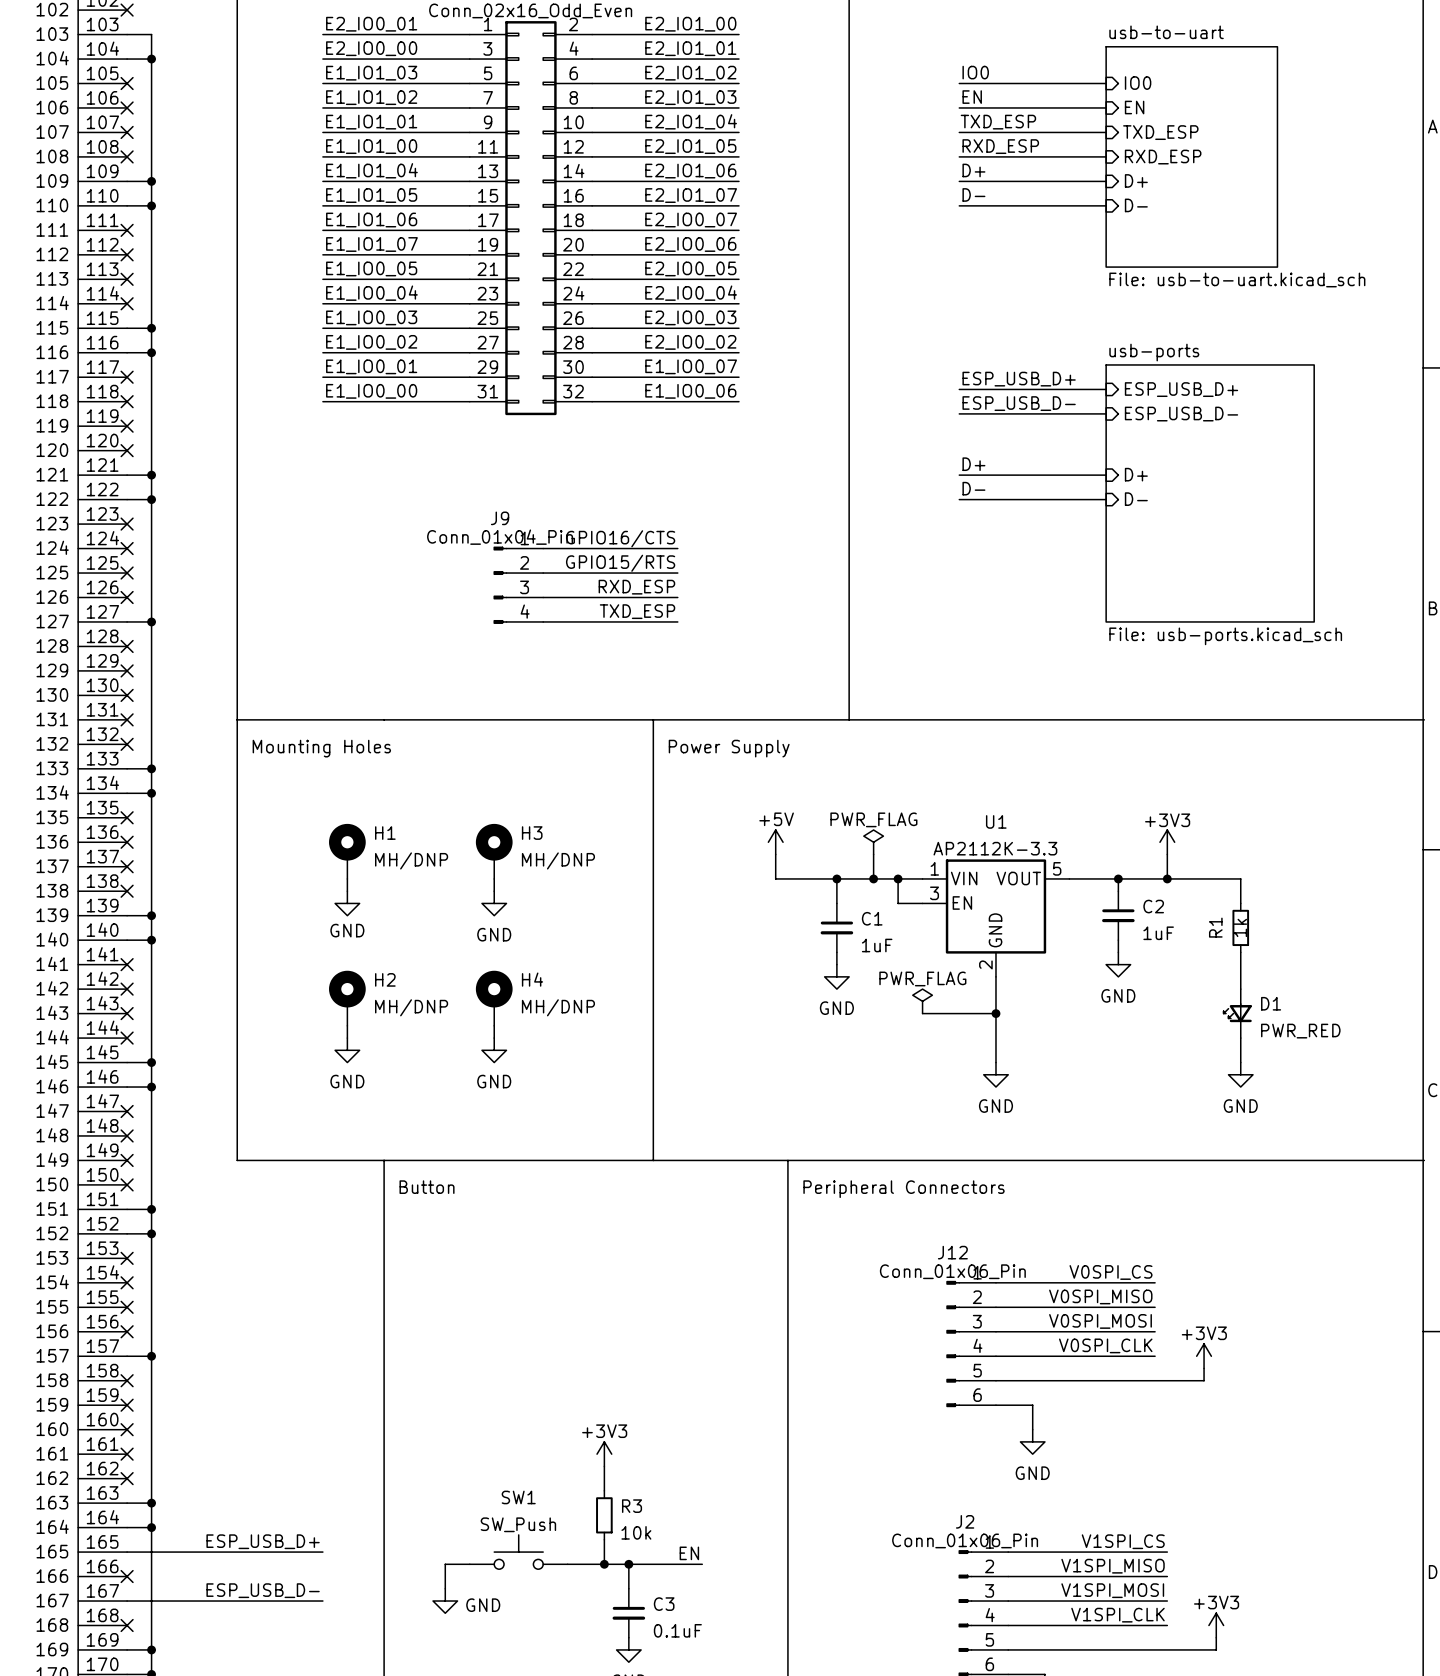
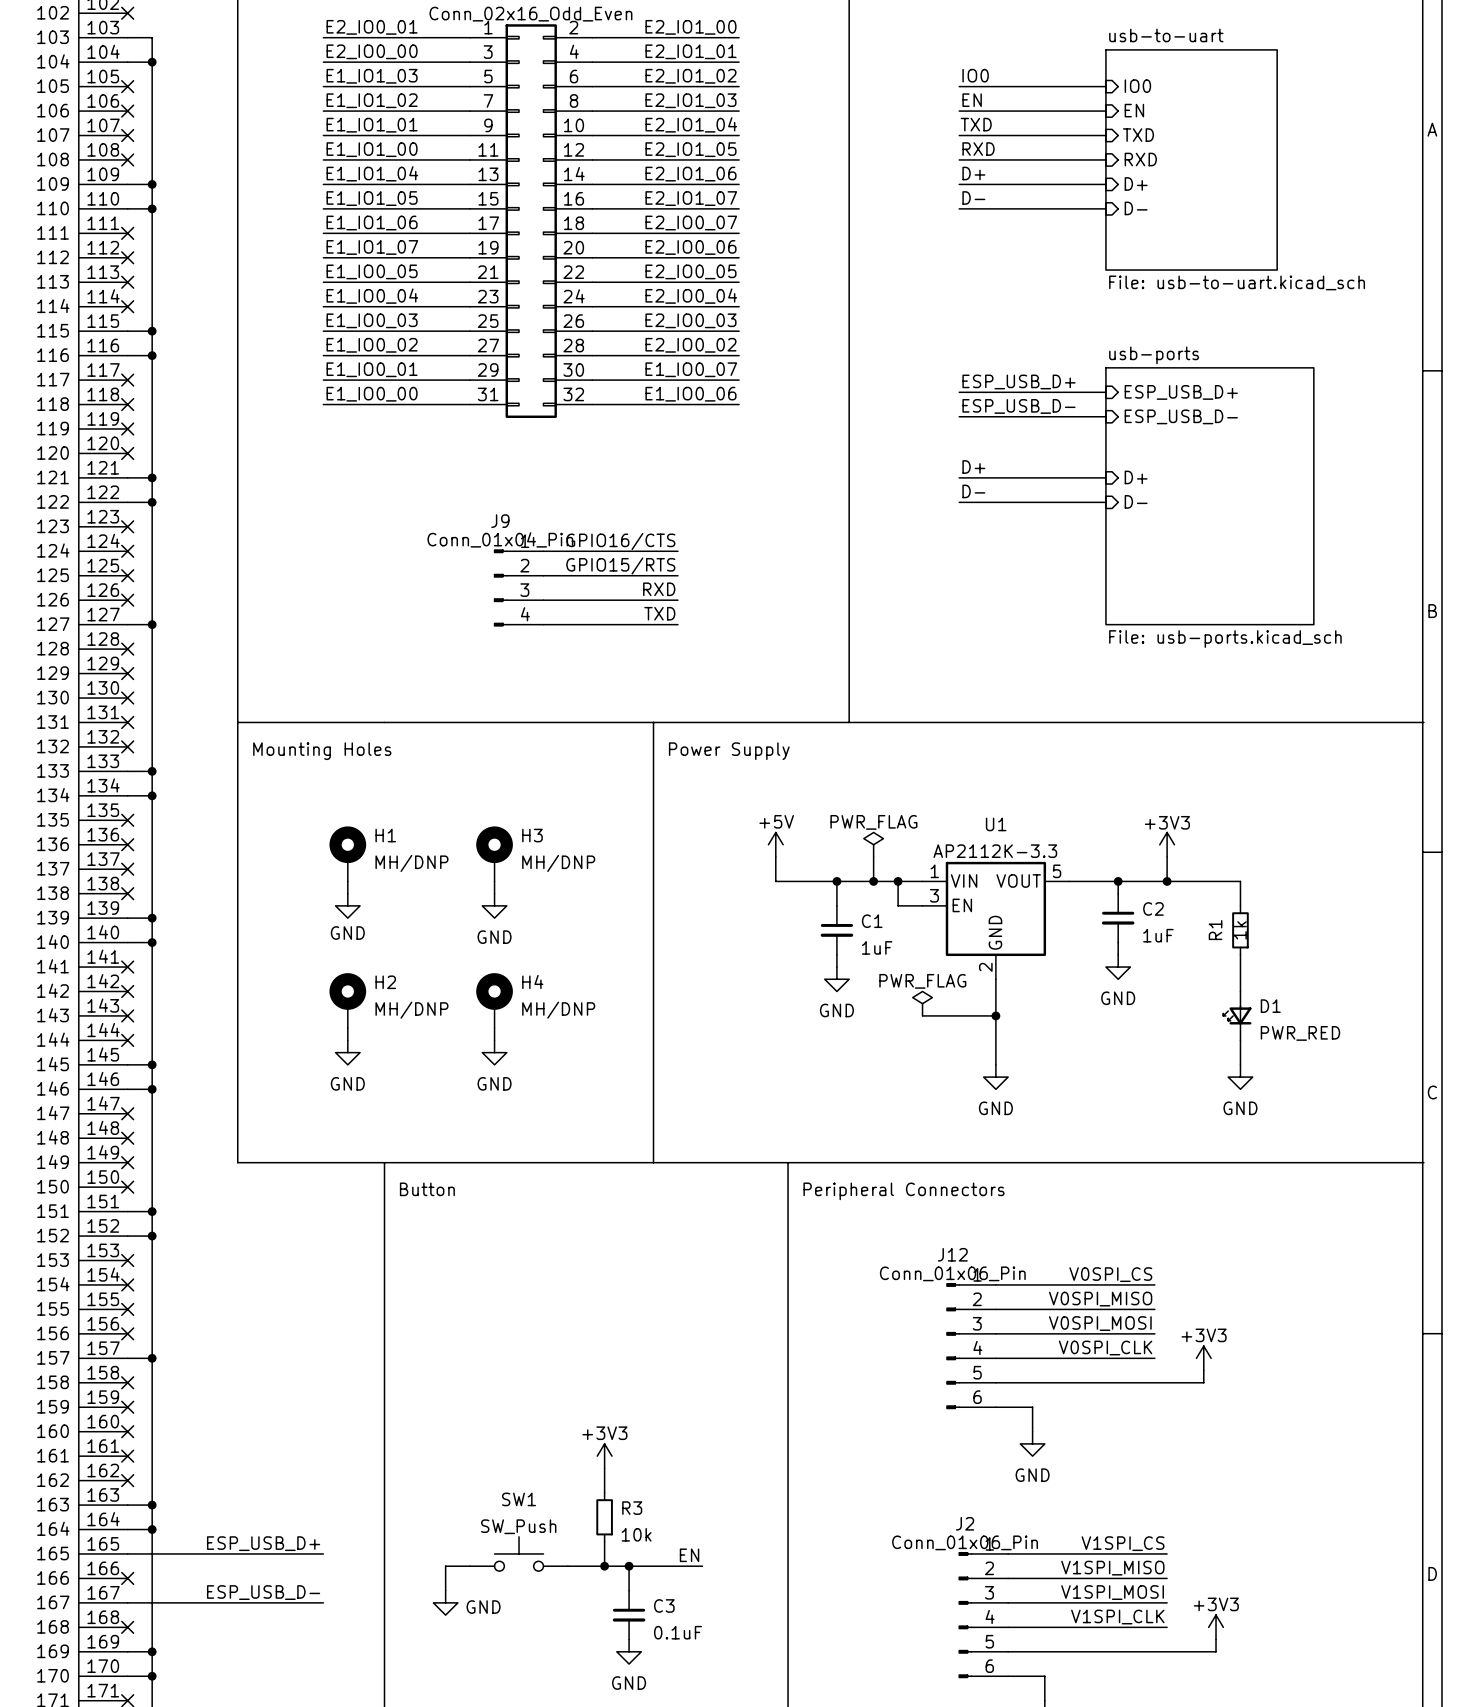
label: TXD_ESP (998, 122) -> TXD (976, 124)
sheet pin: TXD_ESP (1160, 132) -> TXD (1138, 135)
label: RXD_ESP (1000, 146) -> RXD (978, 149)
sheet pin: RXD_ESP (1163, 157) -> RXD (1140, 159)
label: RXD_ESP (636, 587) -> RXD (659, 589)
label: TXD_ESP (637, 611) -> TXD (659, 613)

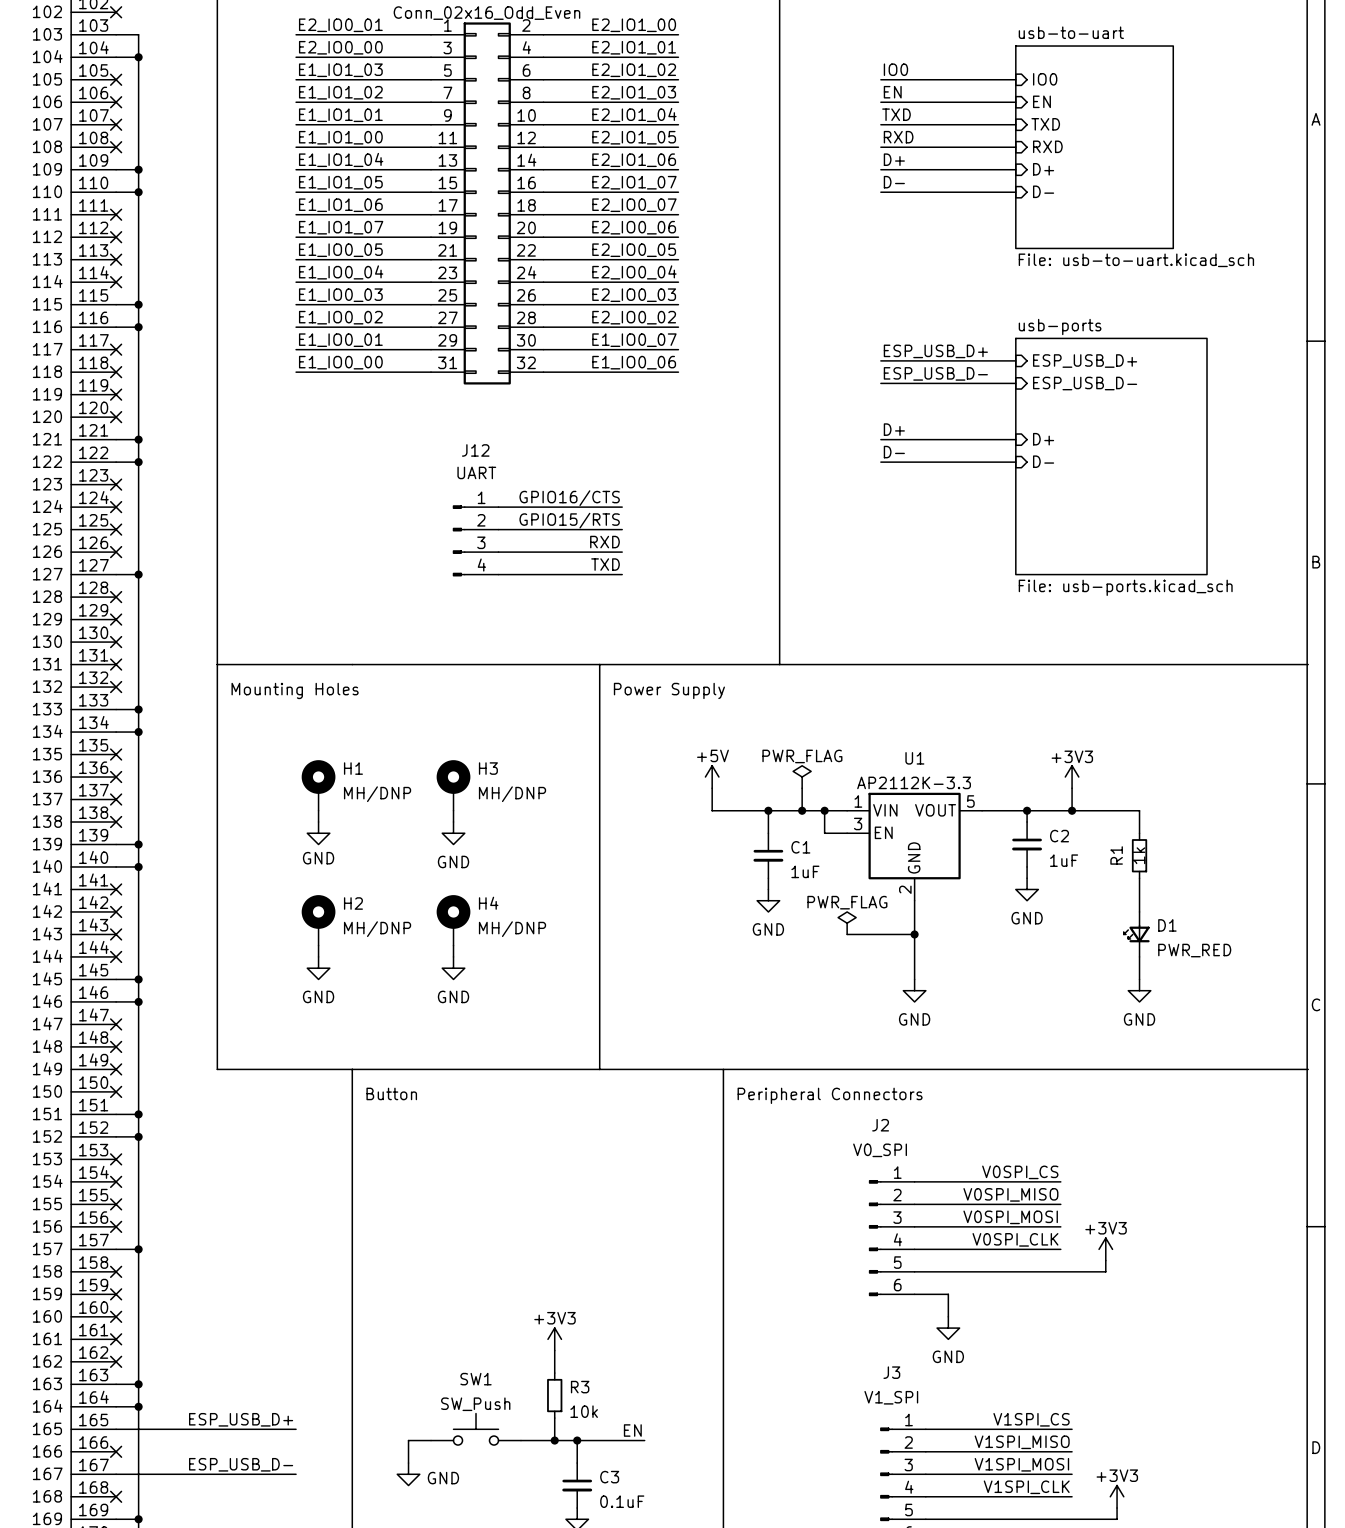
J9 name: J9 (500, 521) -> J12 (475, 450)
J9 value: Conn_01x04_Pin (500, 539) -> UART (476, 472)
J12 name: J12 (952, 1254) -> J2 (880, 1125)
J12 value: Conn_01x06_Pin (952, 1273) -> V0_SPI (880, 1150)
J2 name: J2 (965, 1523) -> J3 (891, 1372)
J2 value: Conn_01x06_Pin (965, 1542) -> V1_SPI (891, 1397)

